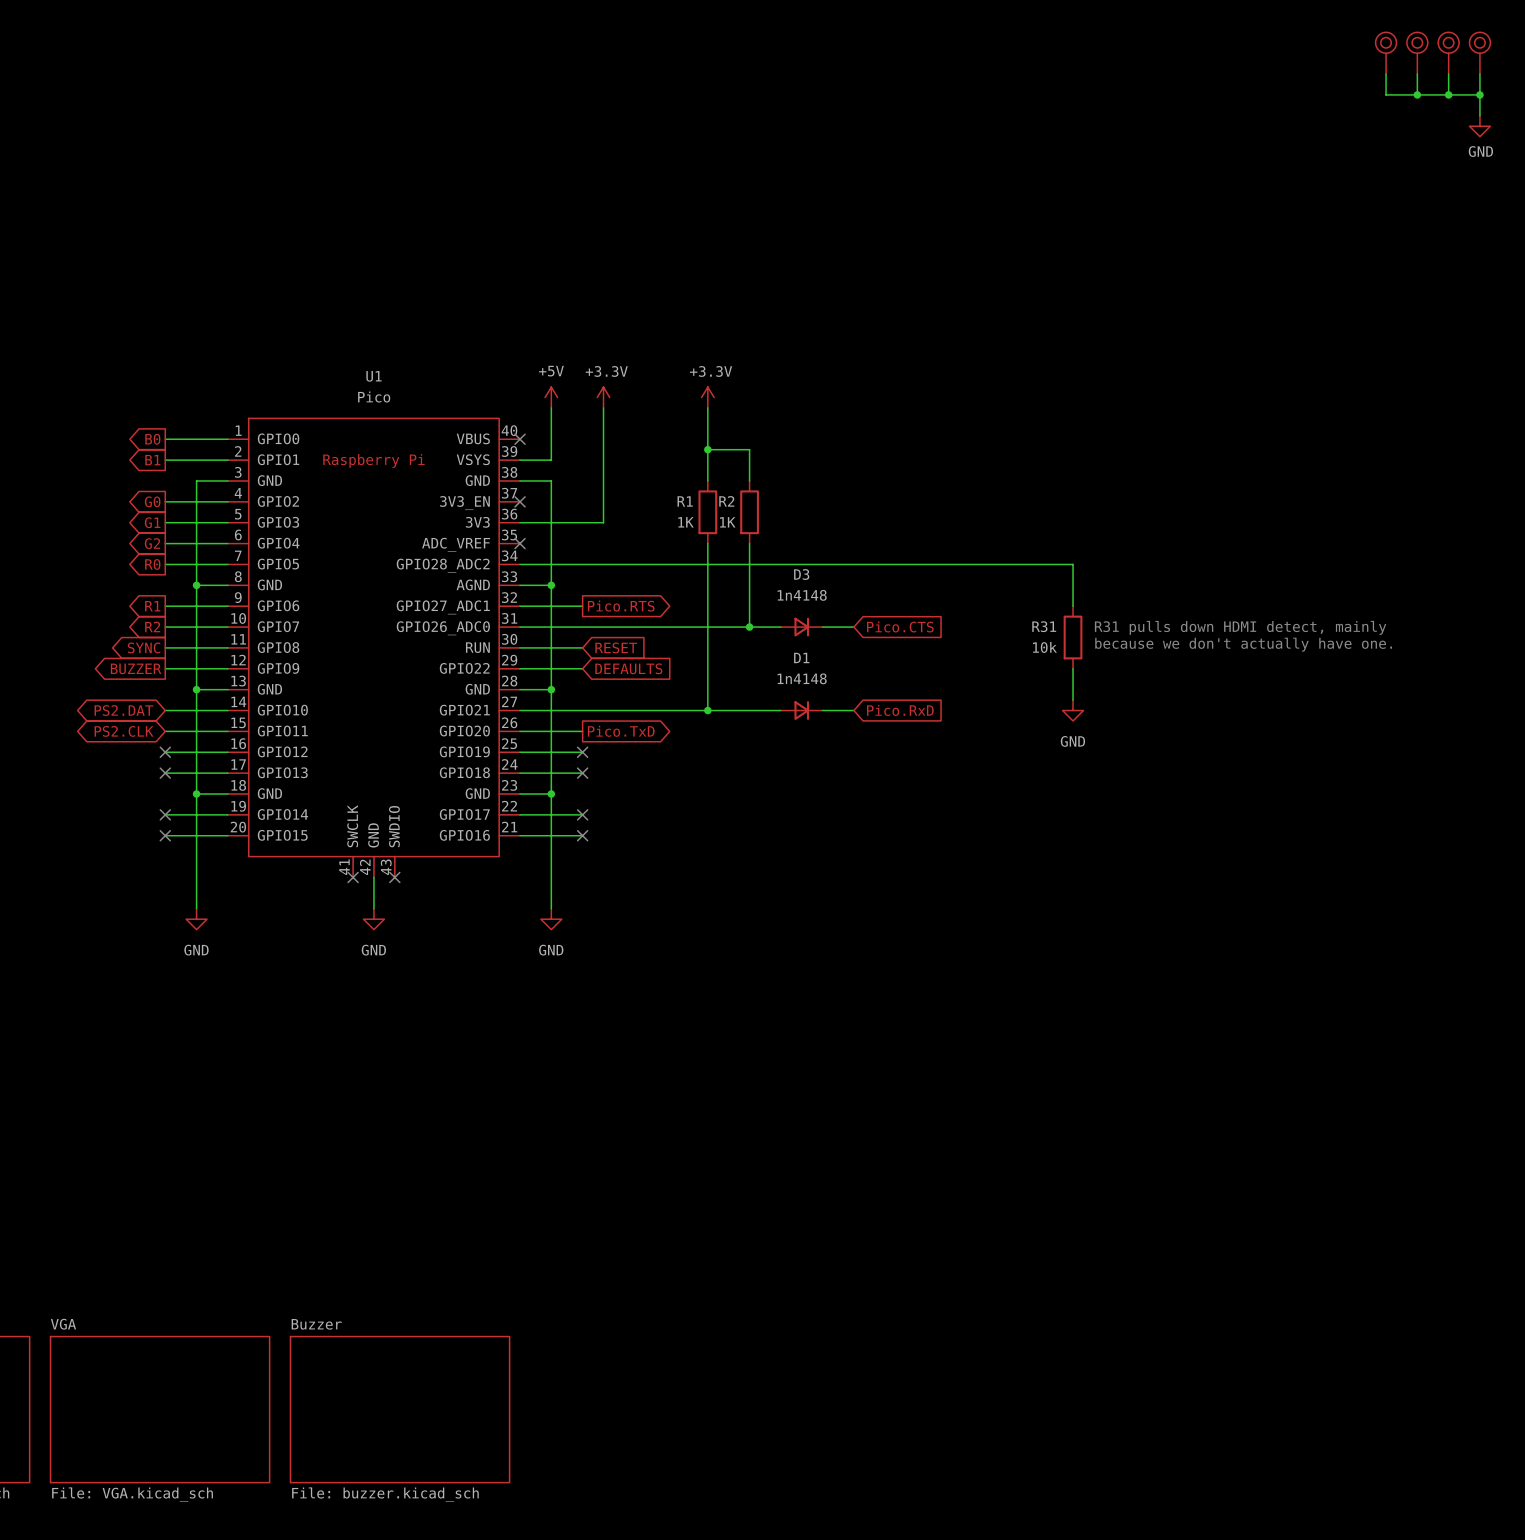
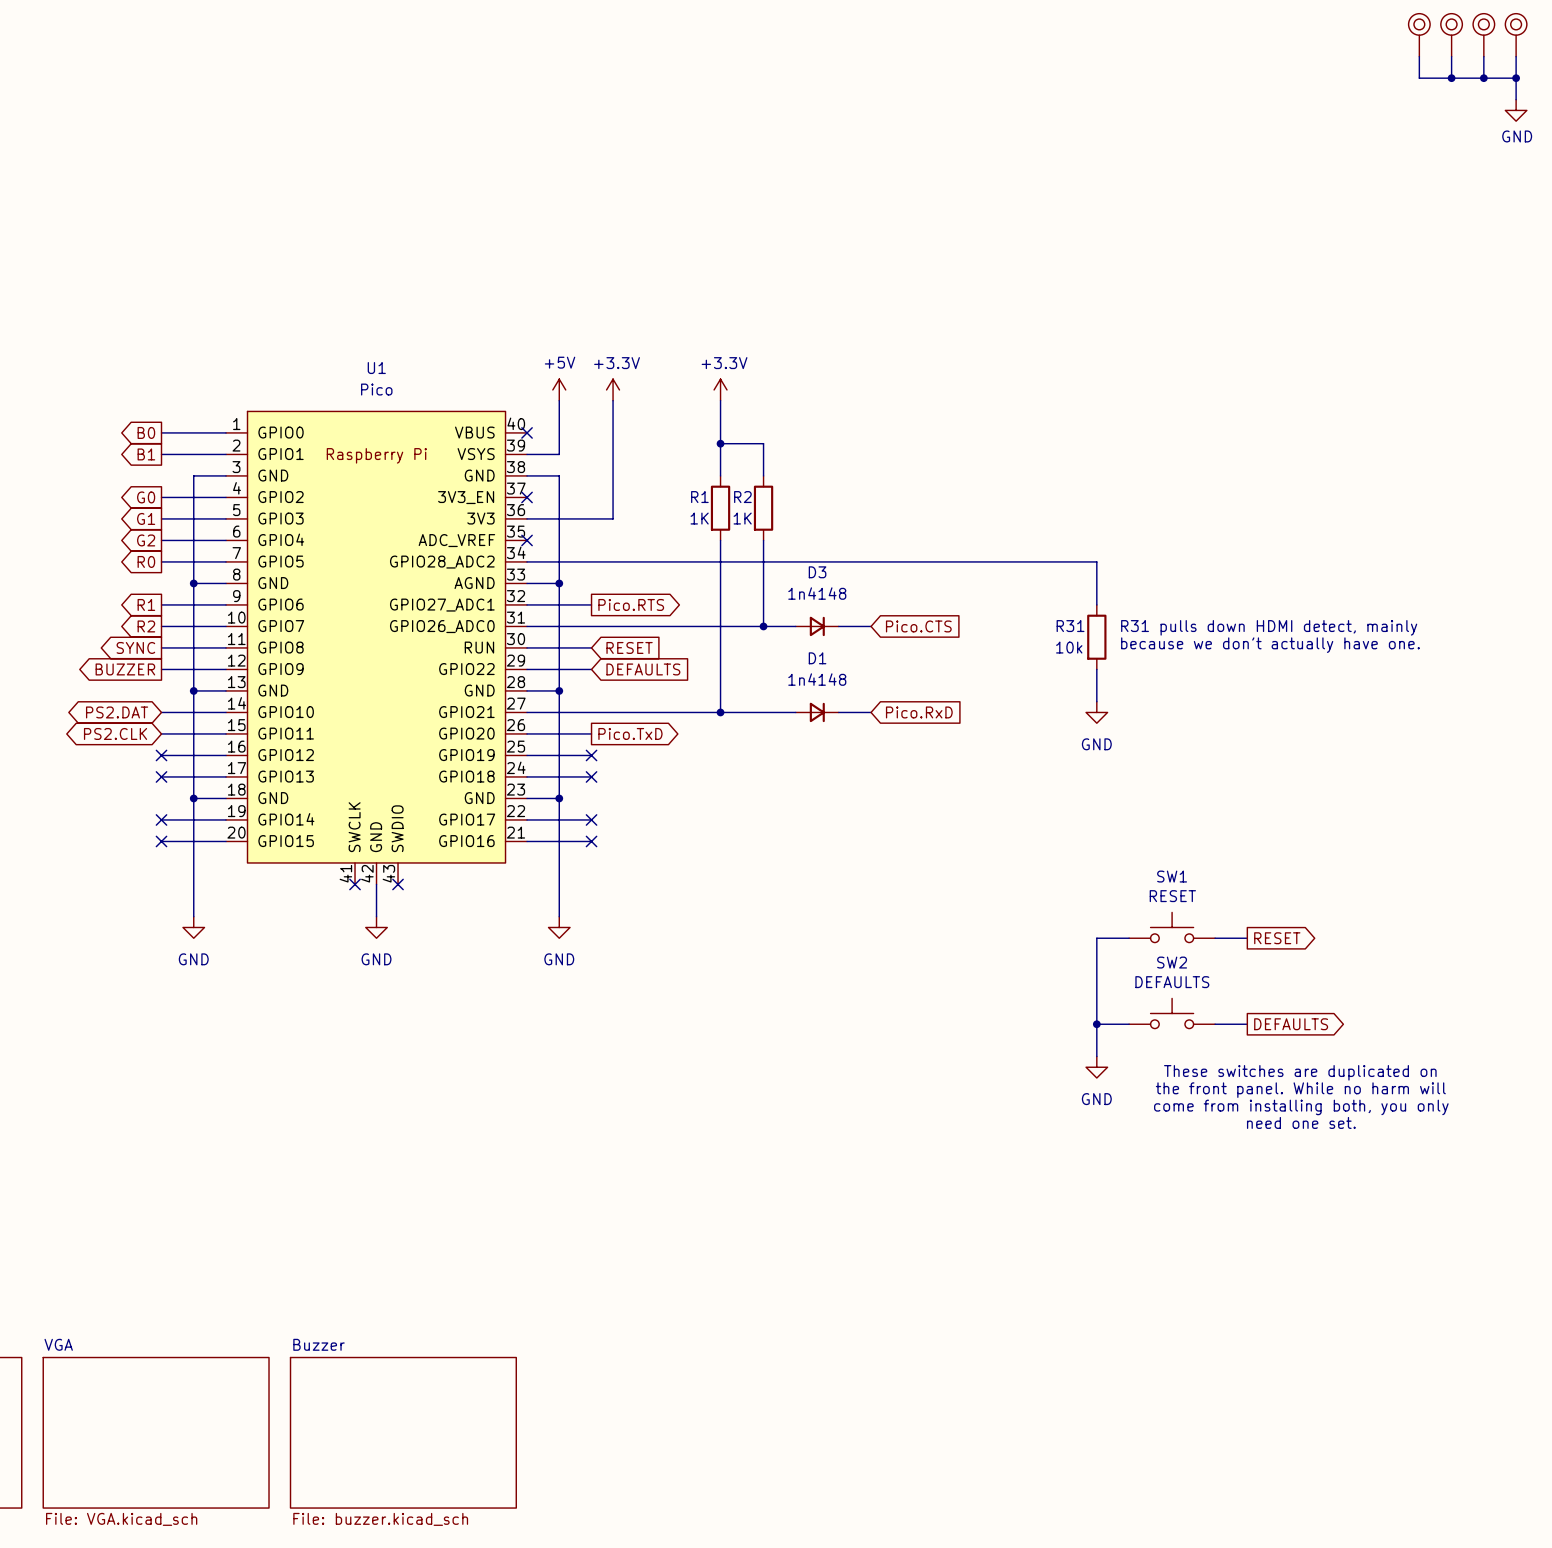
SW1: none -> RESET (1172, 927)
wire: none -> (1129, 938) (1096, 938) (1096, 1056)
wire: none -> (1215, 938) (1247, 938)
global label: none -> RESET (1277, 938)
SW2: none -> DEFAULTS (1172, 1013)
wire: none -> (1096, 1024) (1129, 1024)
junction: none -> (1096, 1024)
wire: none -> (1215, 1024) (1247, 1024)
global label: none -> DEFAULTS (1291, 1024)
power symbol: none -> GND (1096, 1067)
text: none -> These switches are duplicated on (1300, 1072)
text: none -> the front panel. While no harm will (1300, 1090)
text: none -> come from installing both, you only (1301, 1107)
text: none -> need one set. (1301, 1122)

